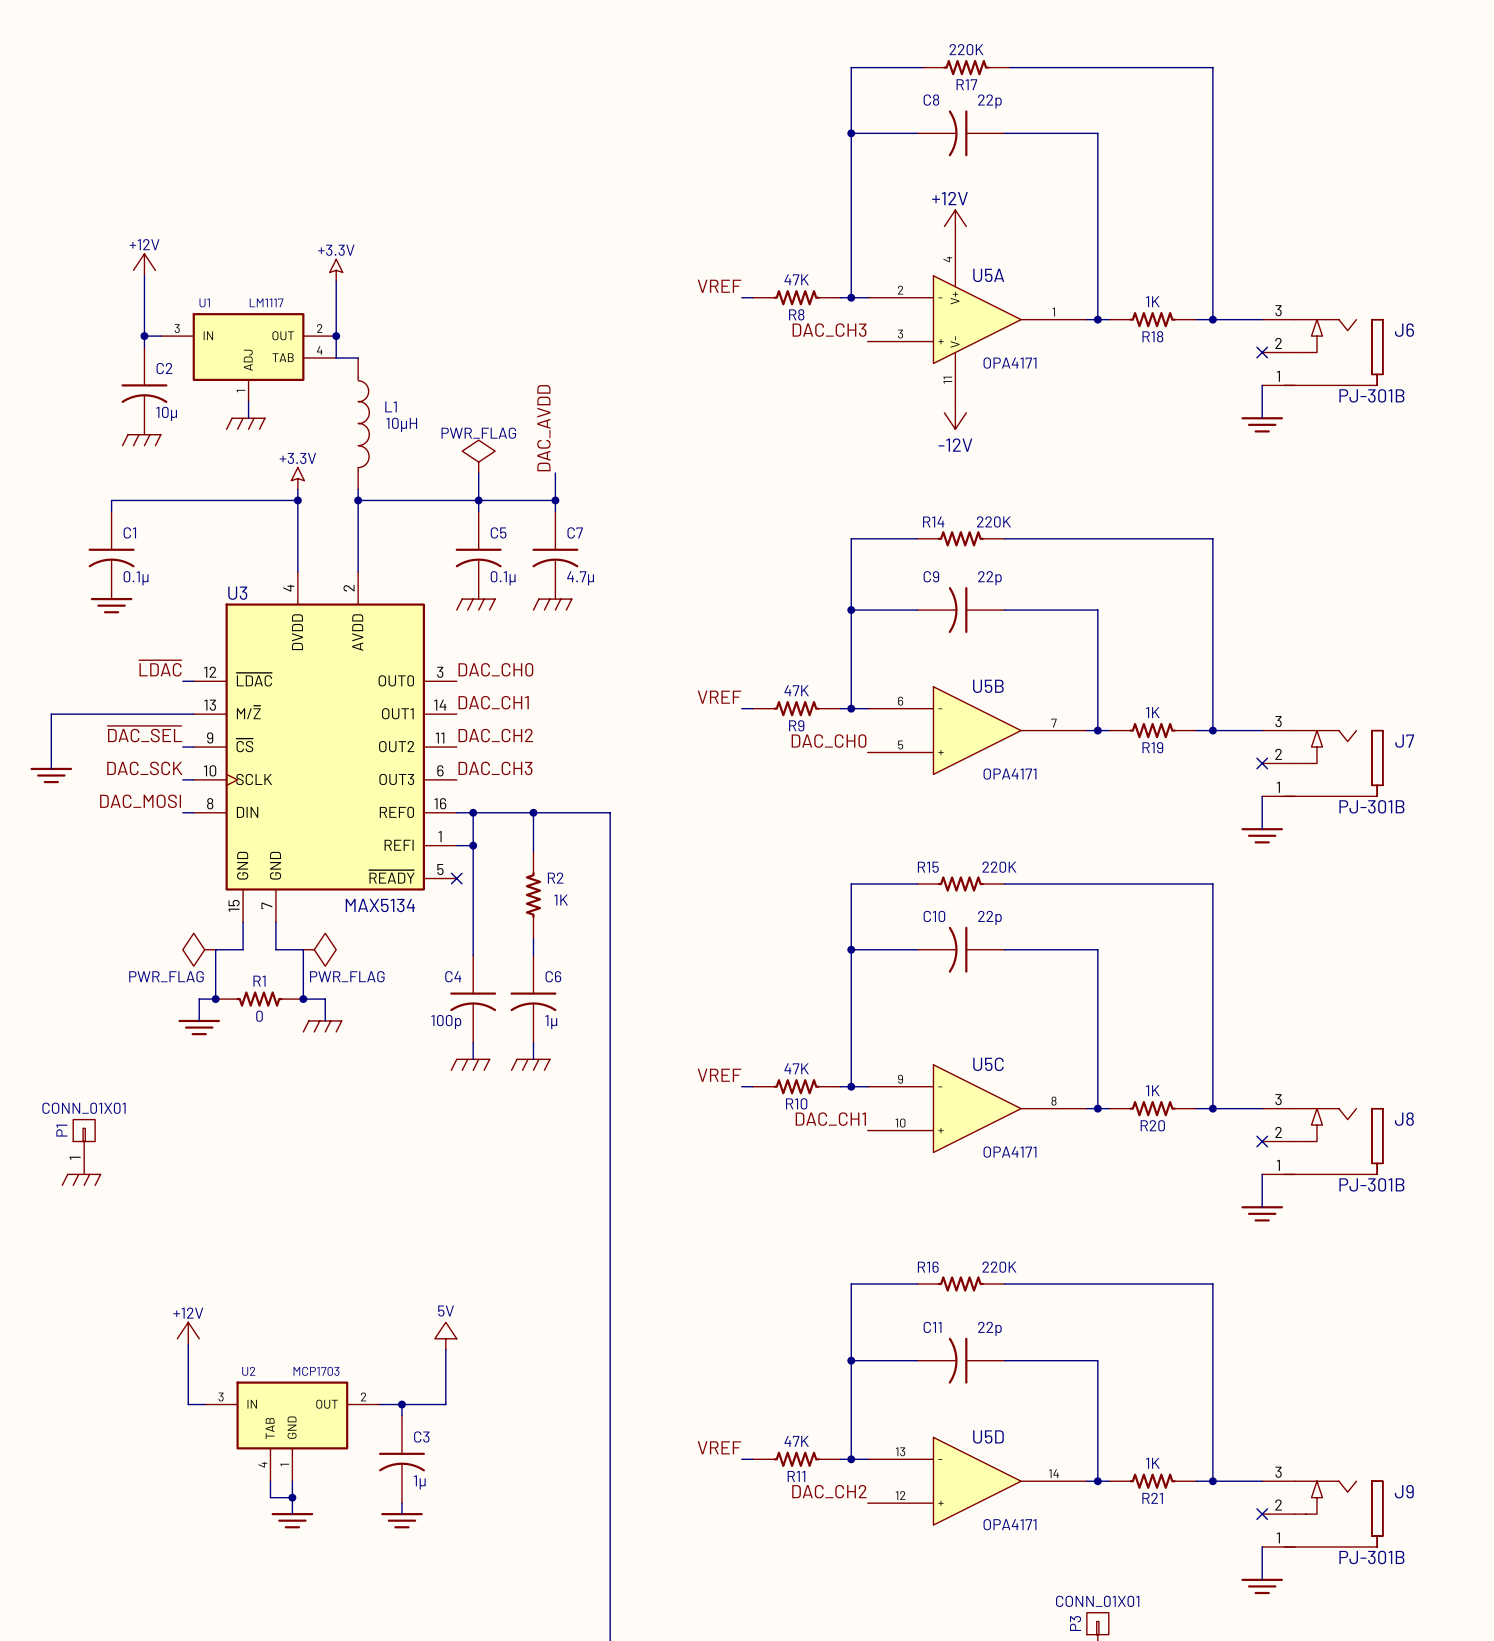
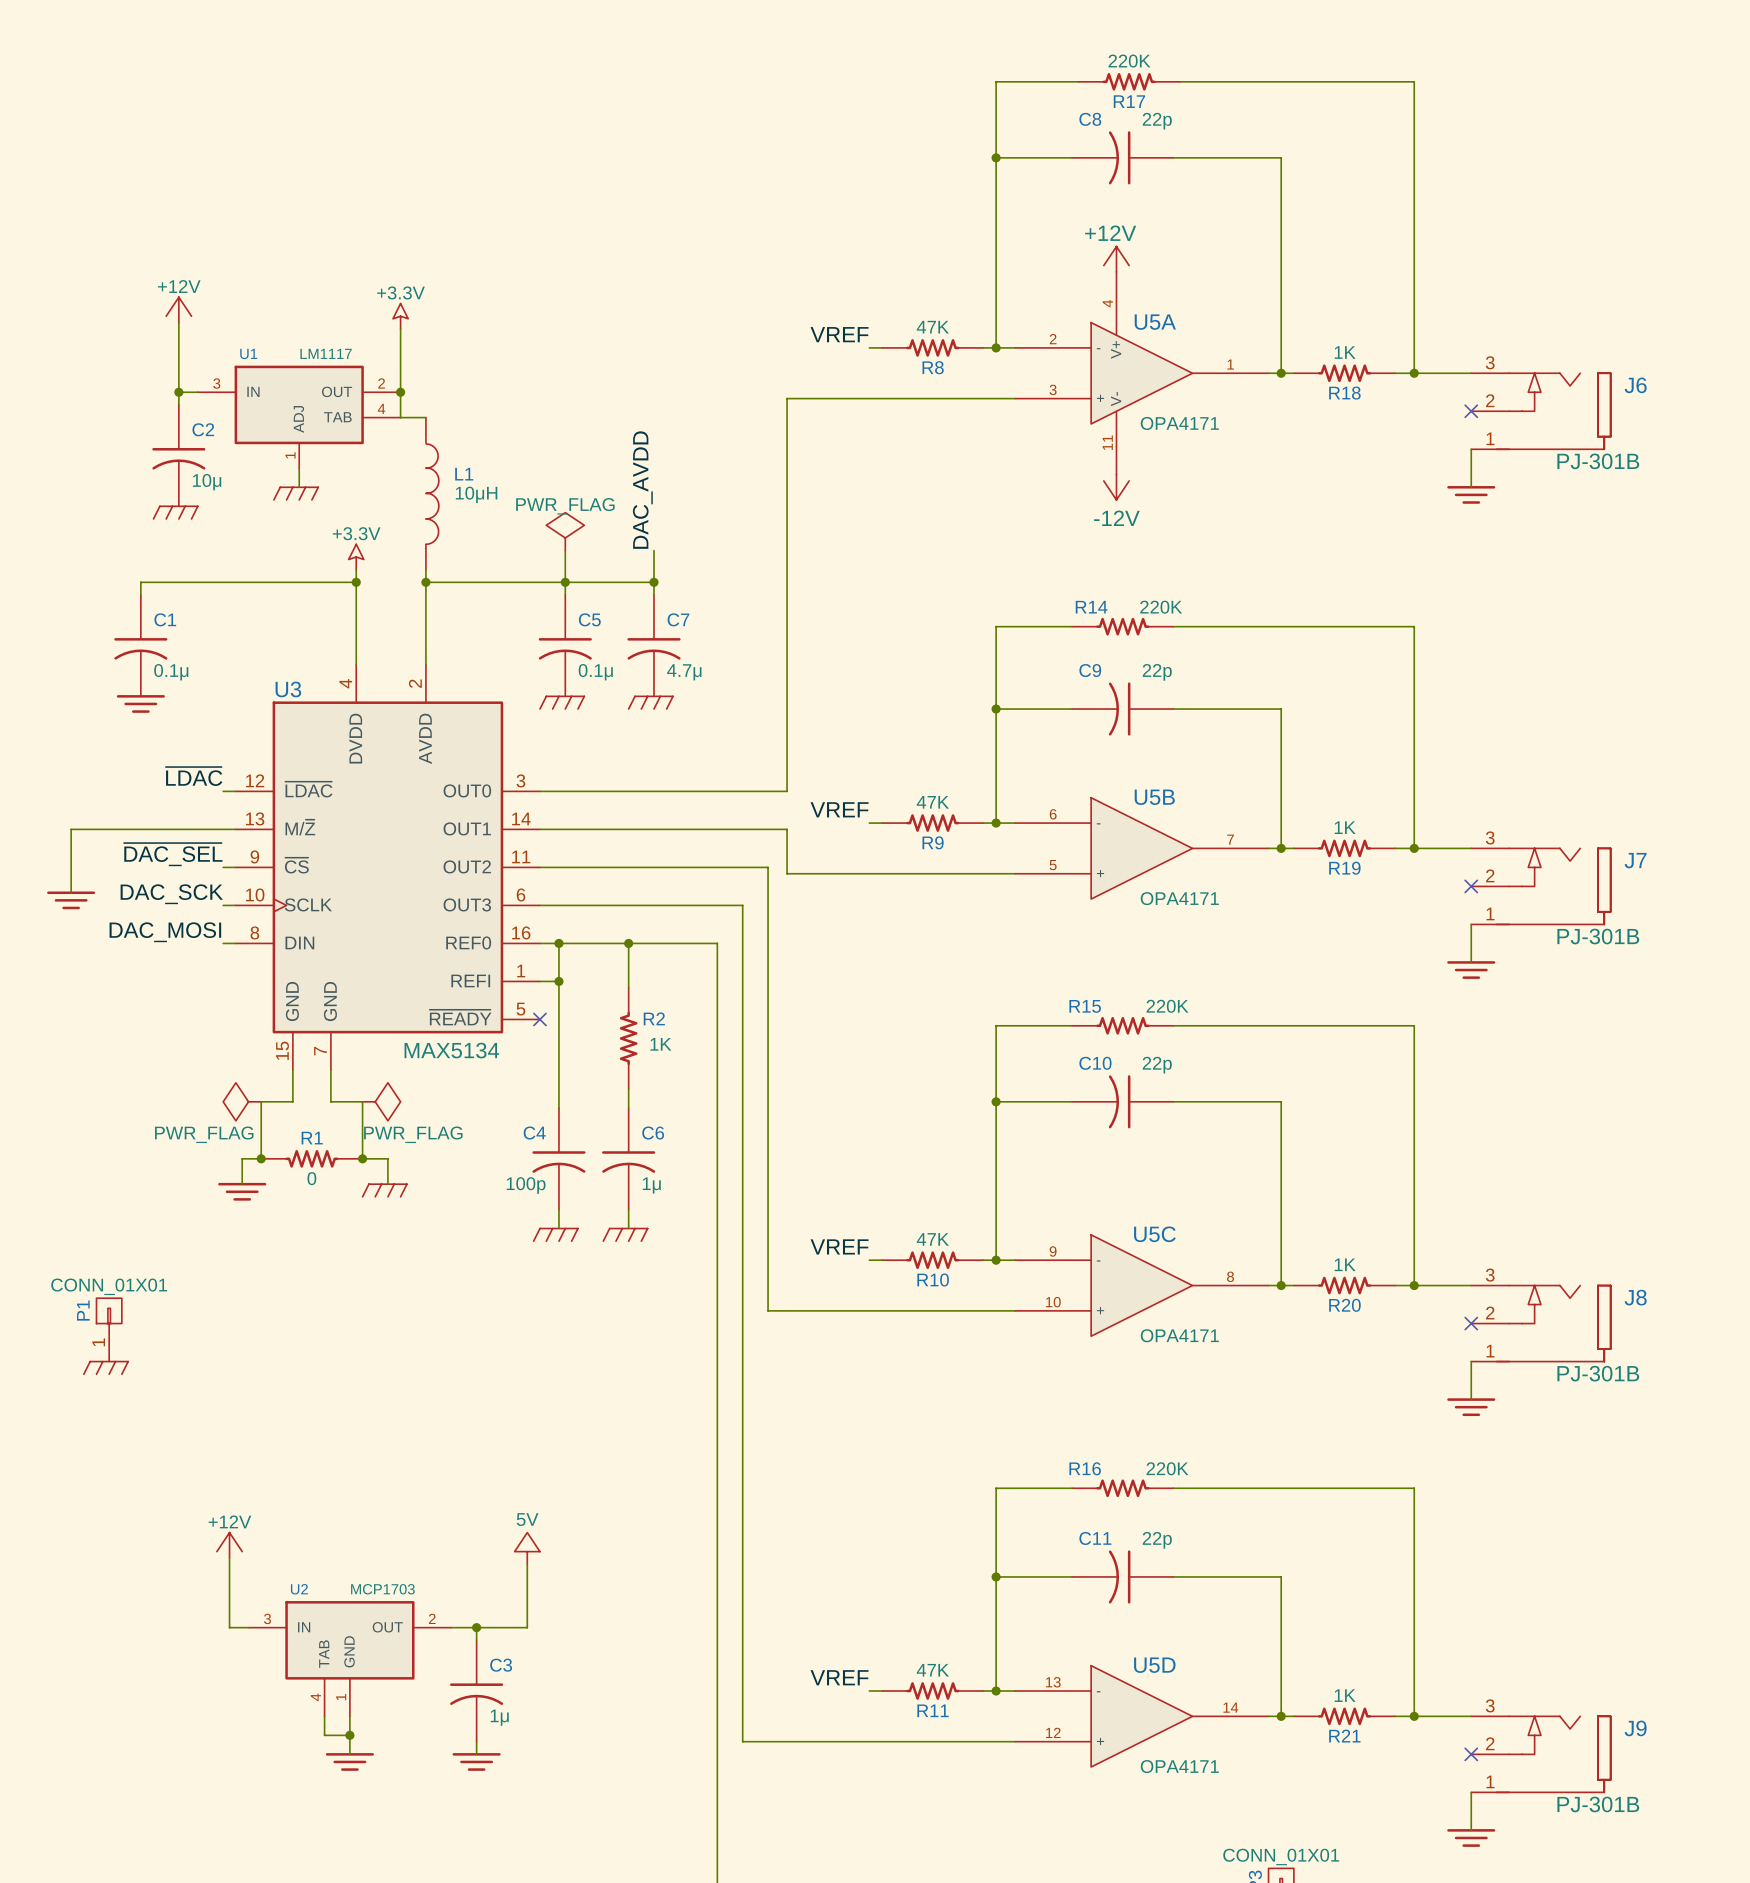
label: DAC_CH3 (829, 330) -> none
wire: none -> (1015, 398) (787, 398) (787, 791) (539, 791)
label: DAC_CH0 (495, 669) -> none
label: DAC_CH1 (493, 702) -> none
wire: none -> (539, 829) (787, 829) (787, 873) (1015, 873)
label: DAC_CH2 (495, 735) -> none
label: DAC_CH0 (829, 741) -> none
wire: none -> (539, 867) (768, 867) (768, 1310) (1015, 1310)
label: DAC_CH3 (495, 768) -> none
wire: none -> (539, 905) (742, 905) (742, 1741) (1015, 1741)
label: DAC_CH1 (830, 1119) -> none
label: DAC_CH2 (829, 1491) -> none

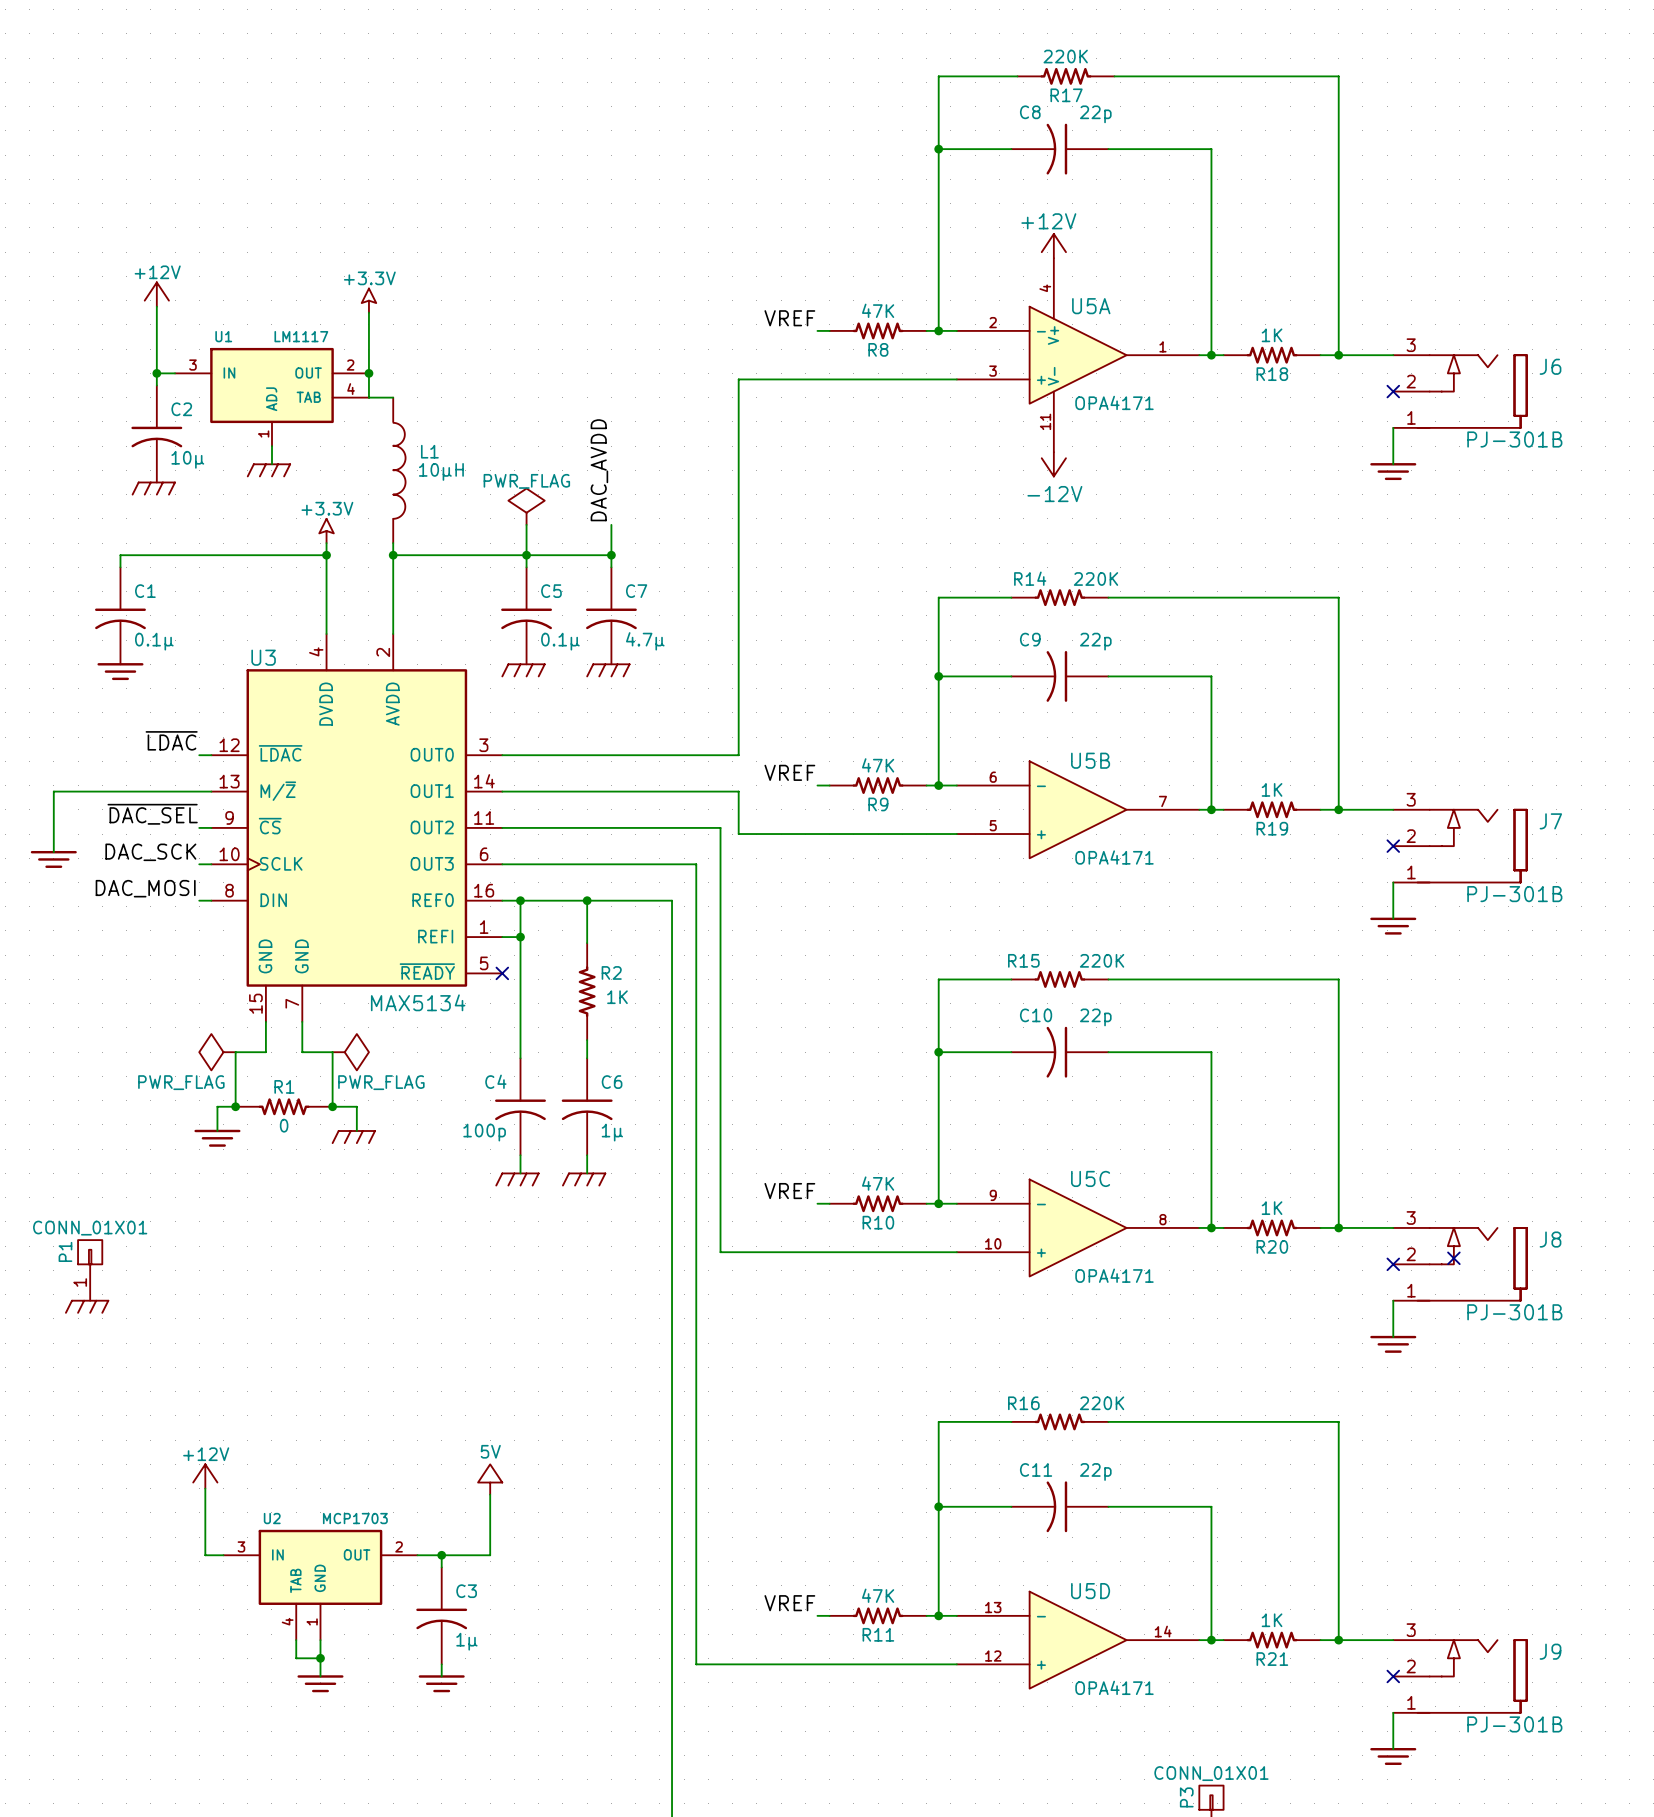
no-connect mark: none -> (1453, 1258)

